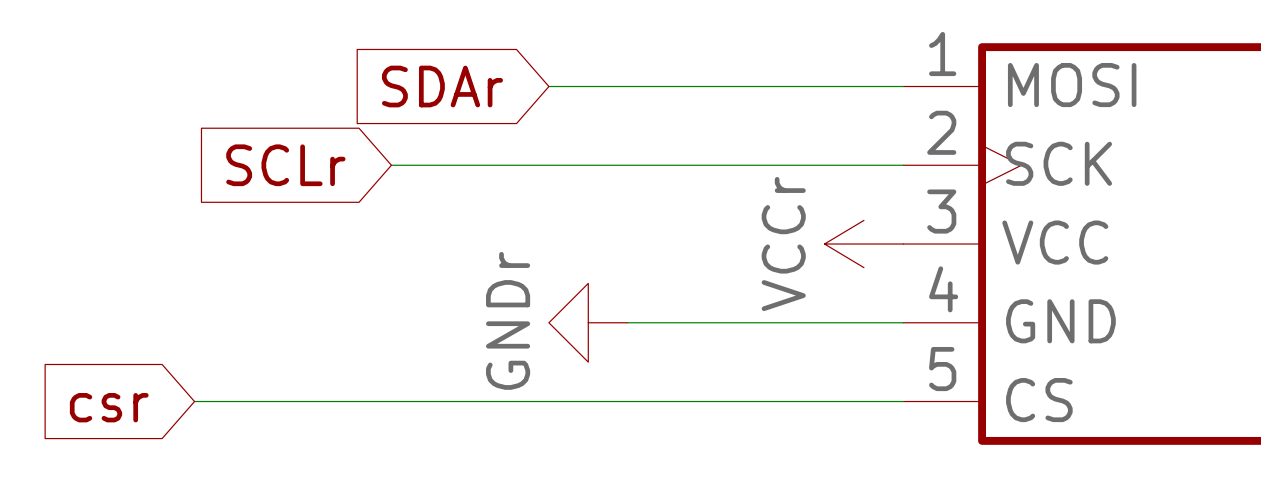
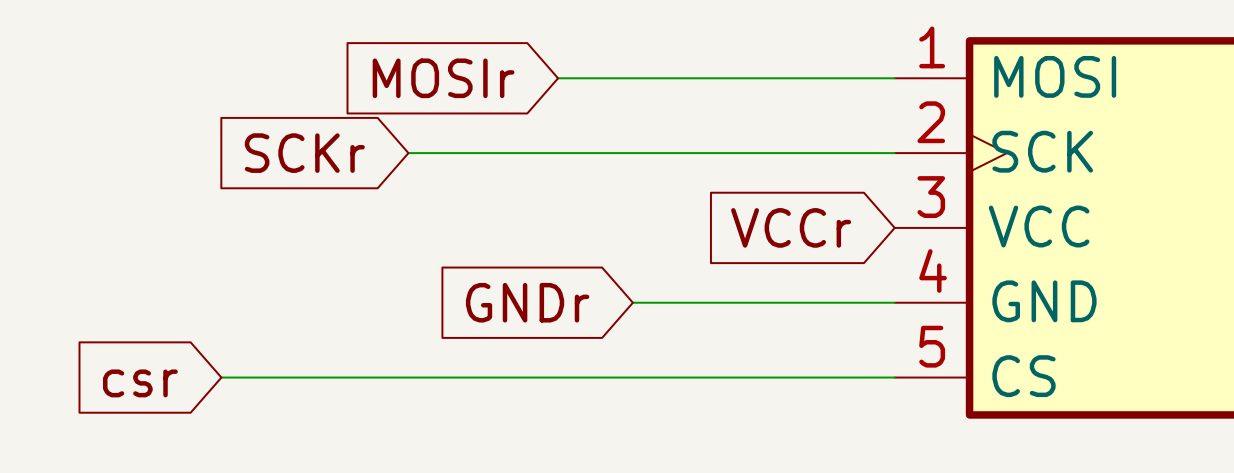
global label: SDAr (442, 86) -> MOSIr (443, 78)
global label: SCLr (285, 165) -> SCKr (304, 153)
global label: none -> VCCr (791, 227)
power symbol: VCCr (863, 244) -> none
global label: none -> GNDr (527, 302)
power symbol: GNDr (588, 322) -> none

